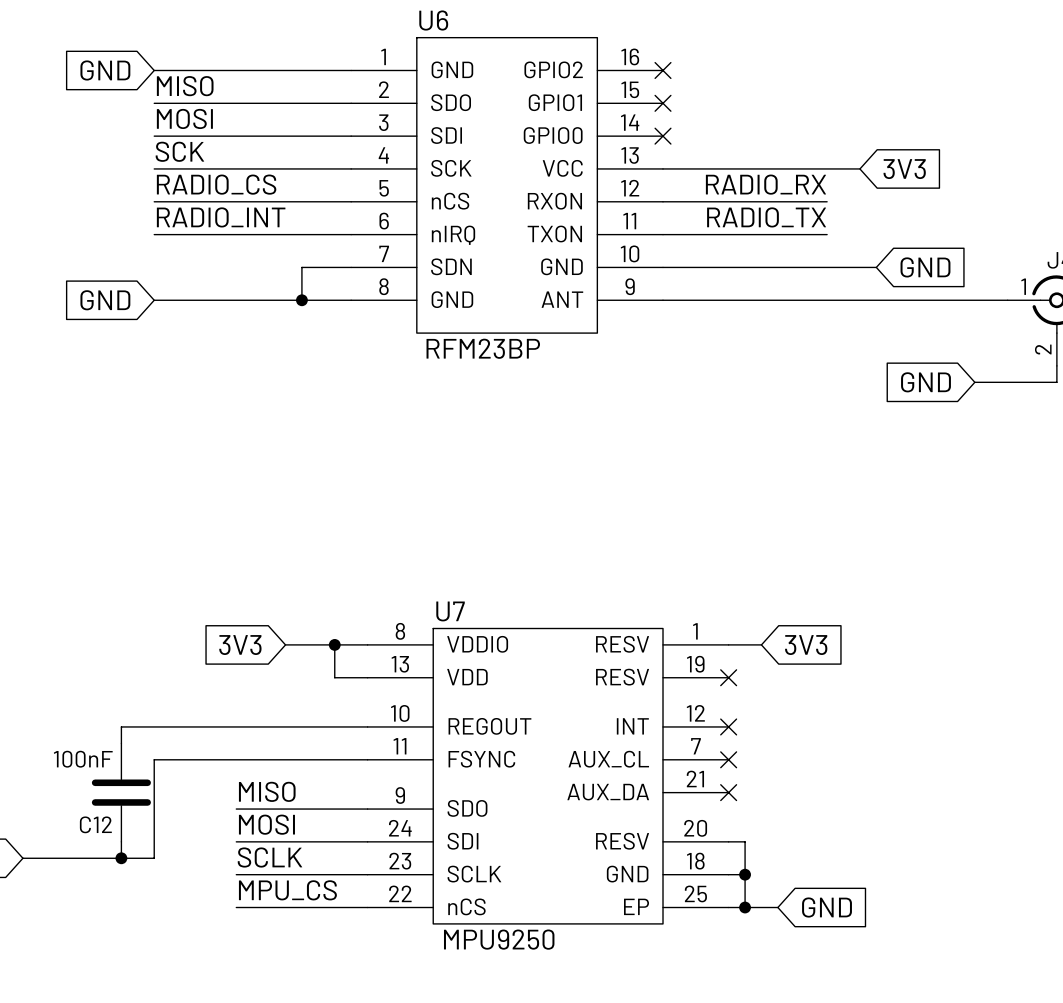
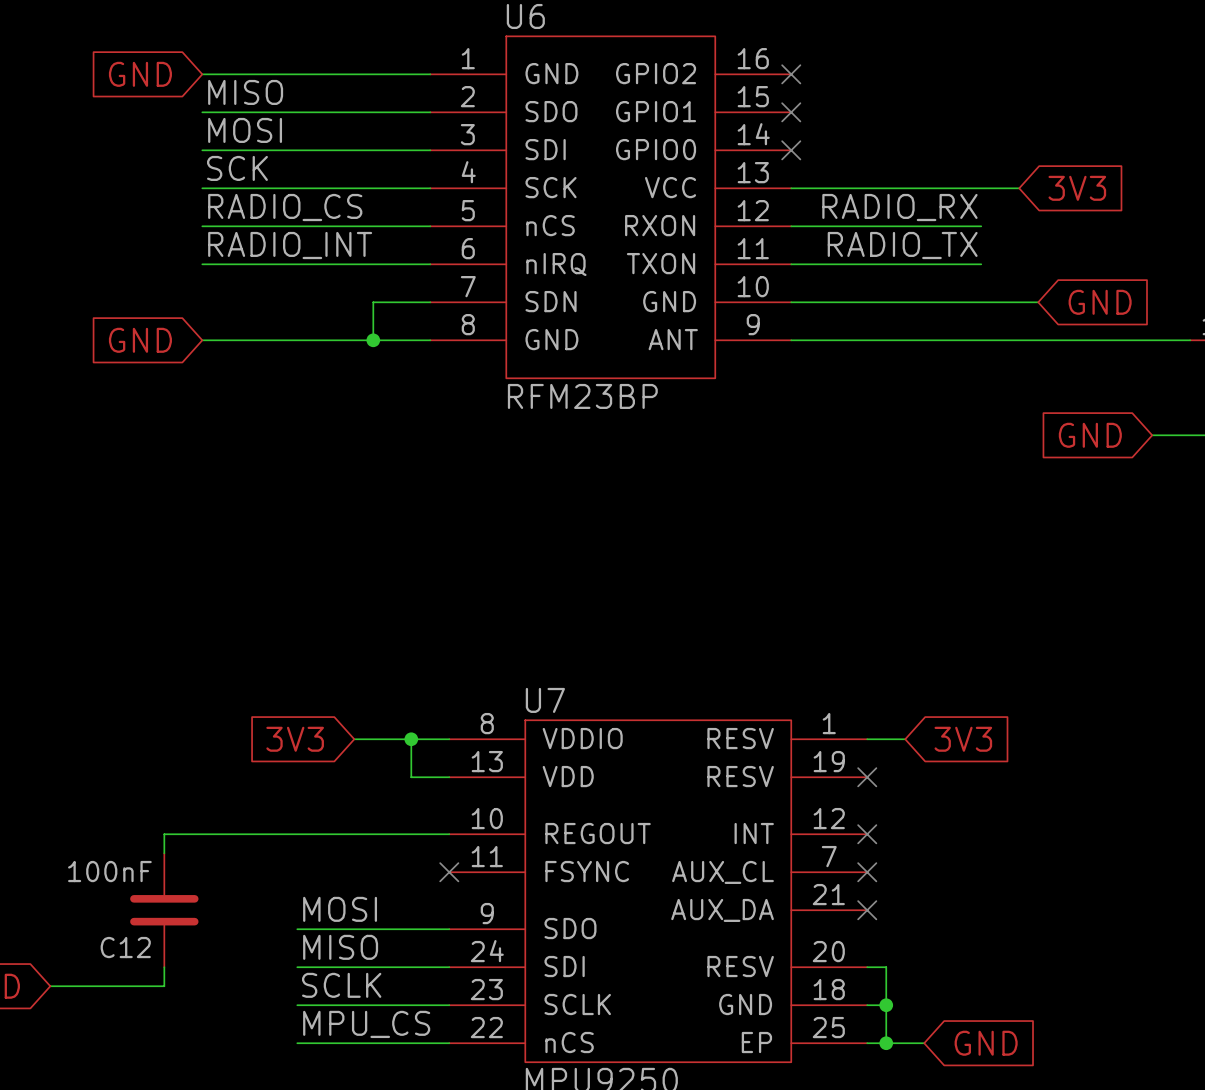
wire: (367, 759) (154, 759) (154, 858) (121, 858) -> none
no-connect mark: none -> (449, 872)
label: MISO (267, 791) -> MOSI (340, 909)
label: MOSI (266, 824) -> MISO (340, 947)
junction: (121, 858) -> none

